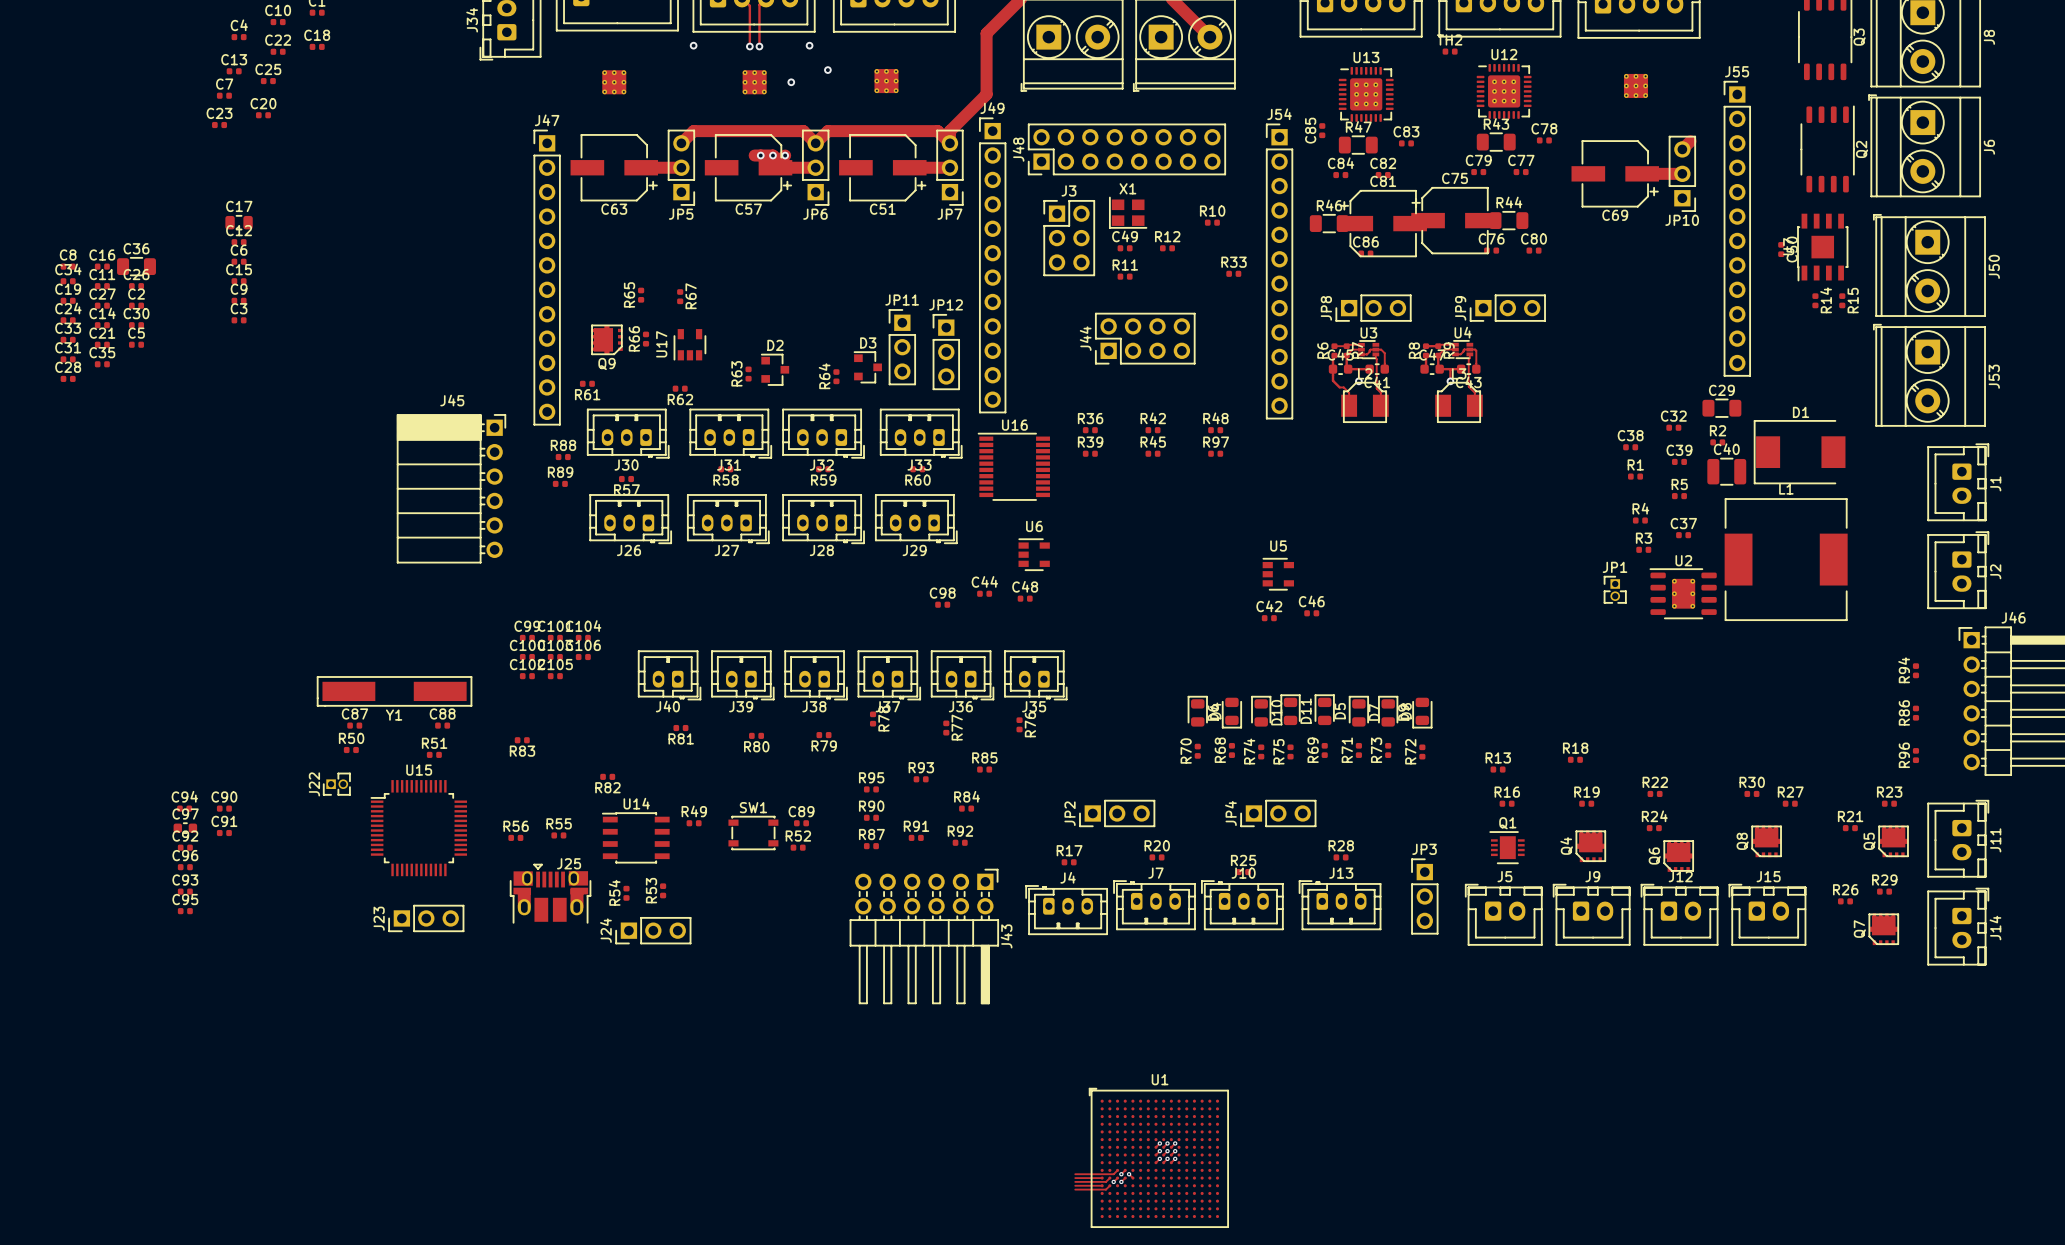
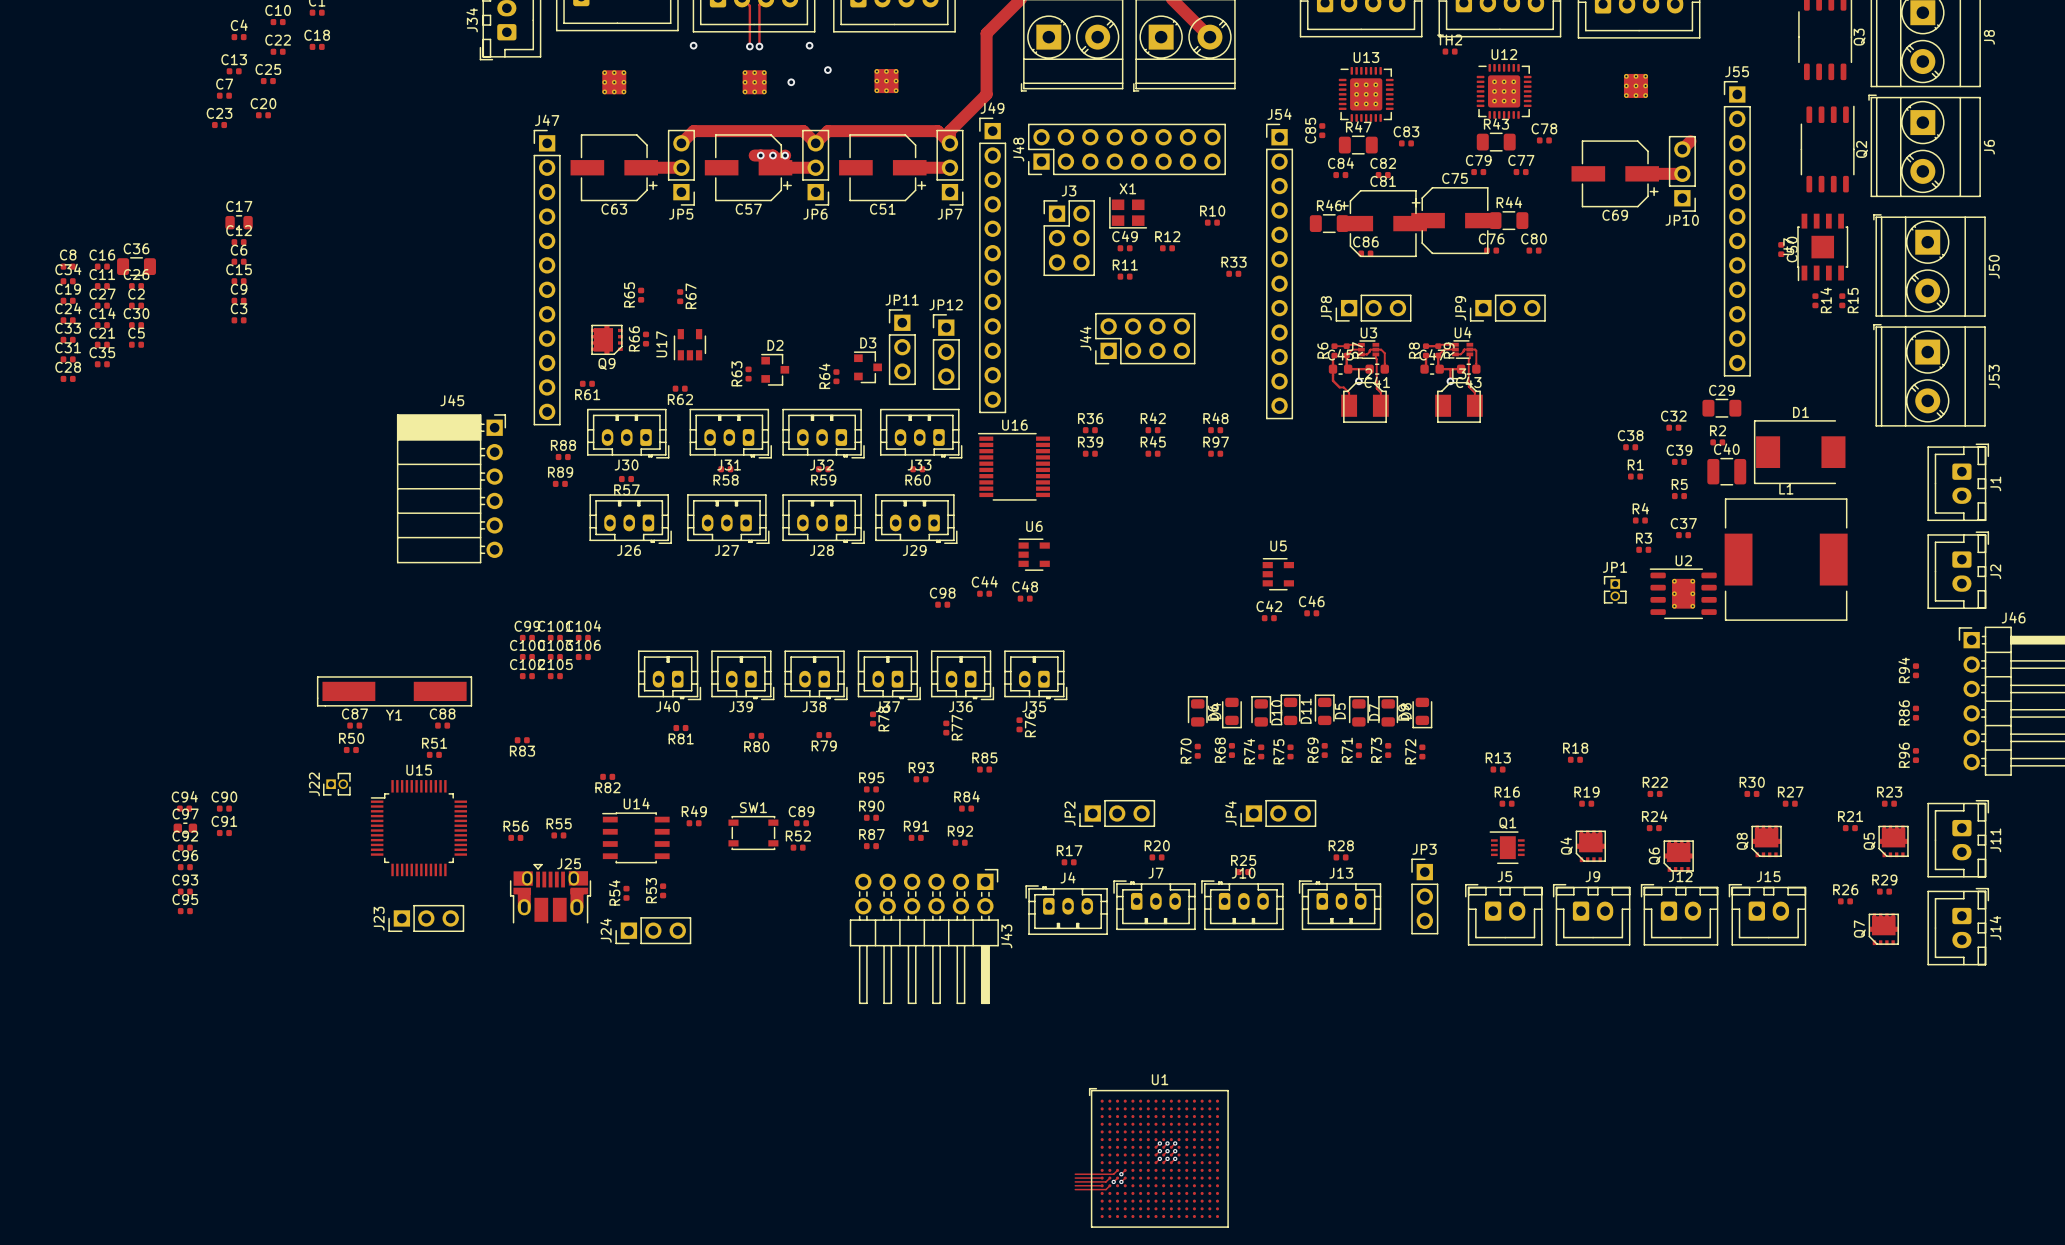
track: (1129, 1174) (1132, 1178) -> none
via: (1129, 1174) -> none

